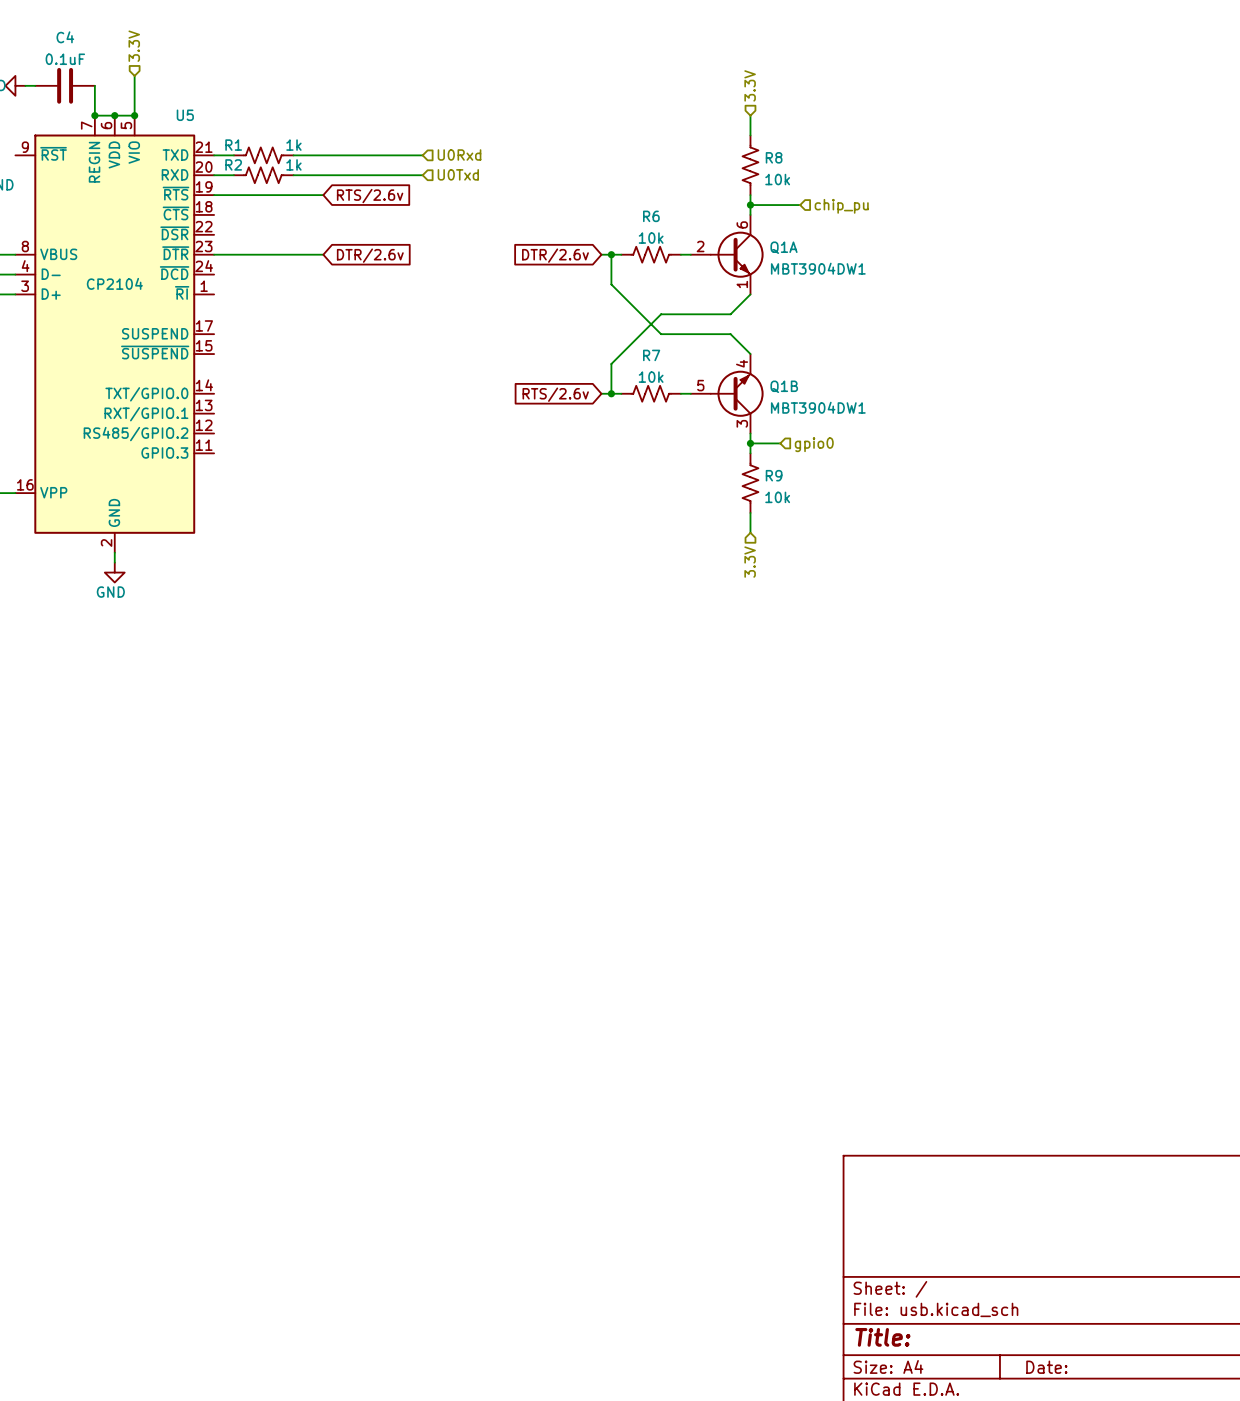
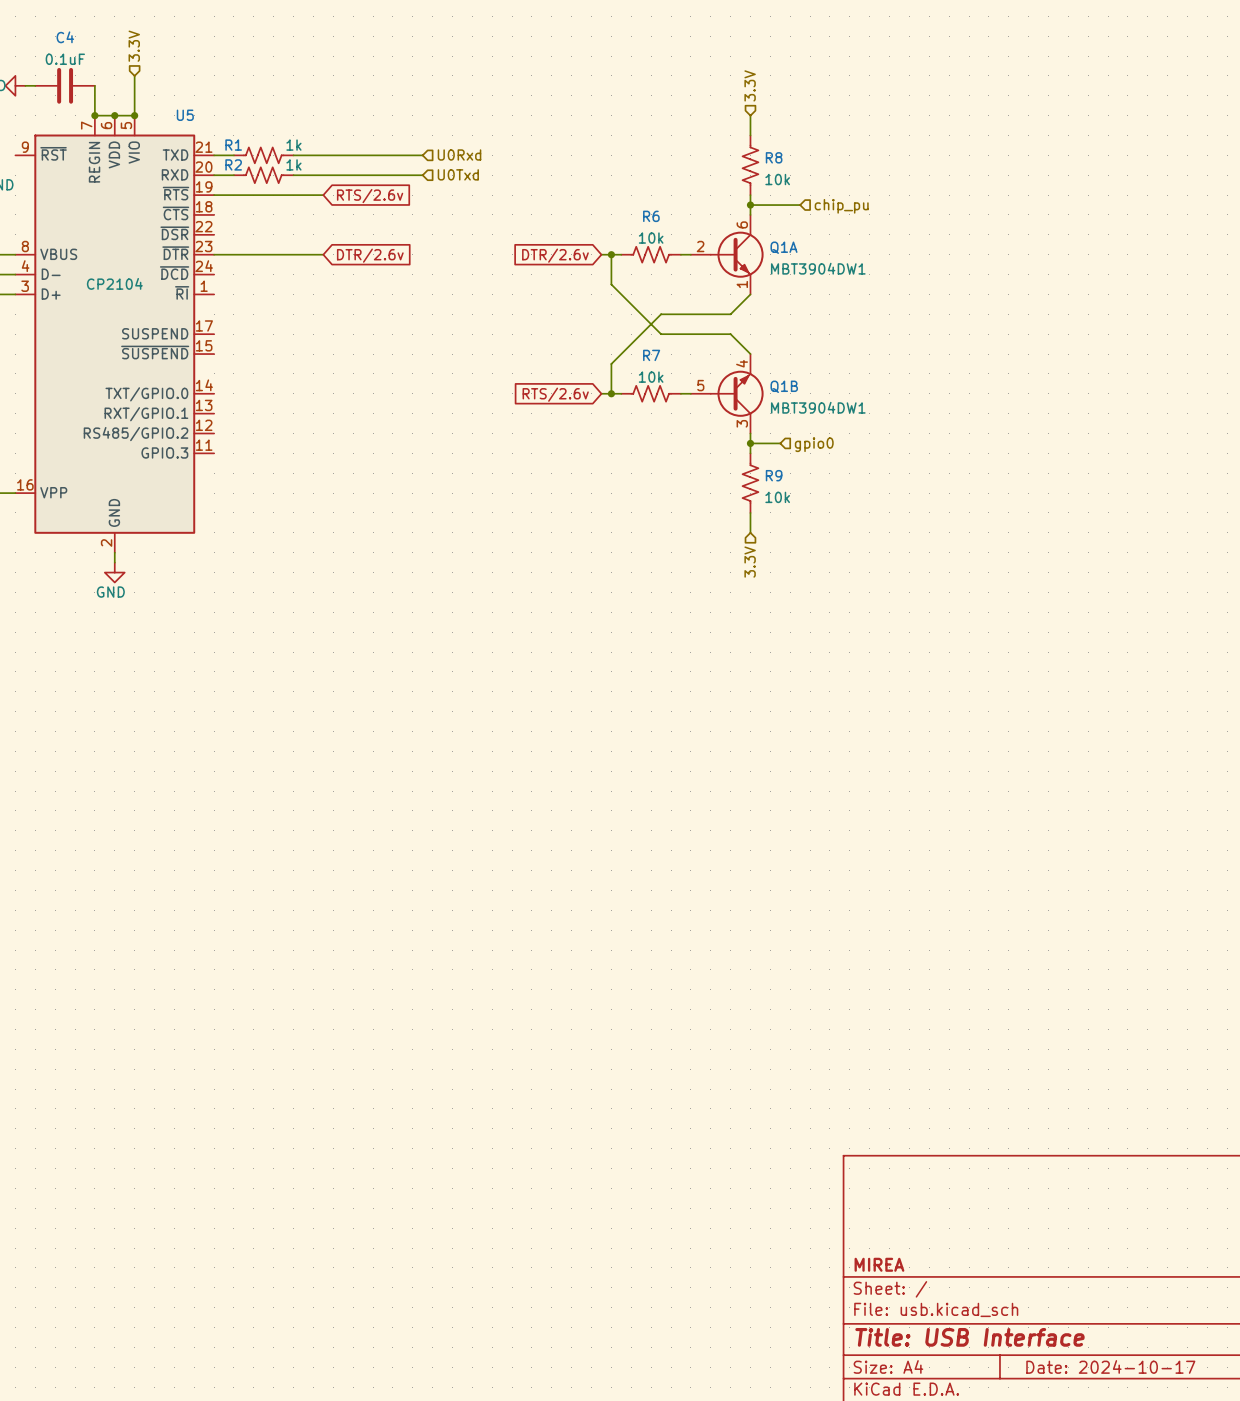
title block: none -> MIREA (879, 1264)
title block: Title: (882, 1337) -> Title: USB Interface (970, 1337)
title block: Date: (1046, 1367) -> Date: 2024-10-17 (1110, 1366)

